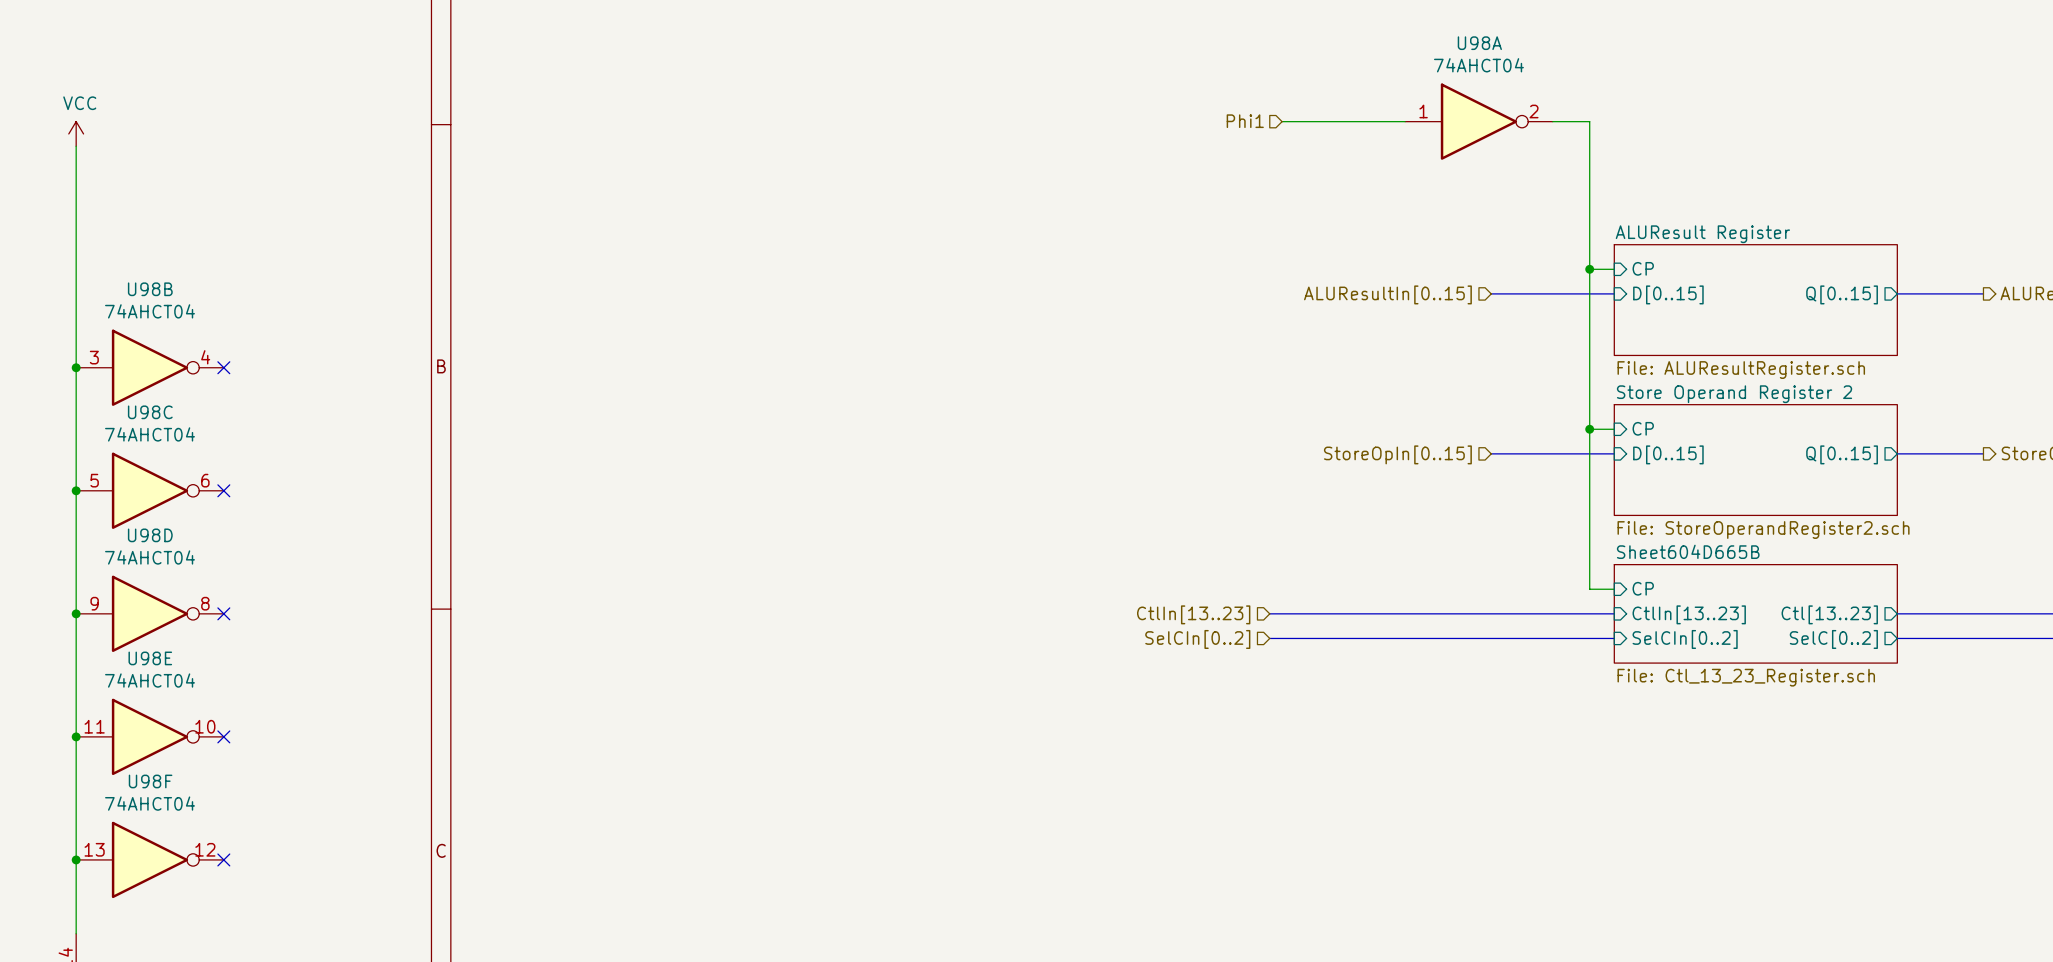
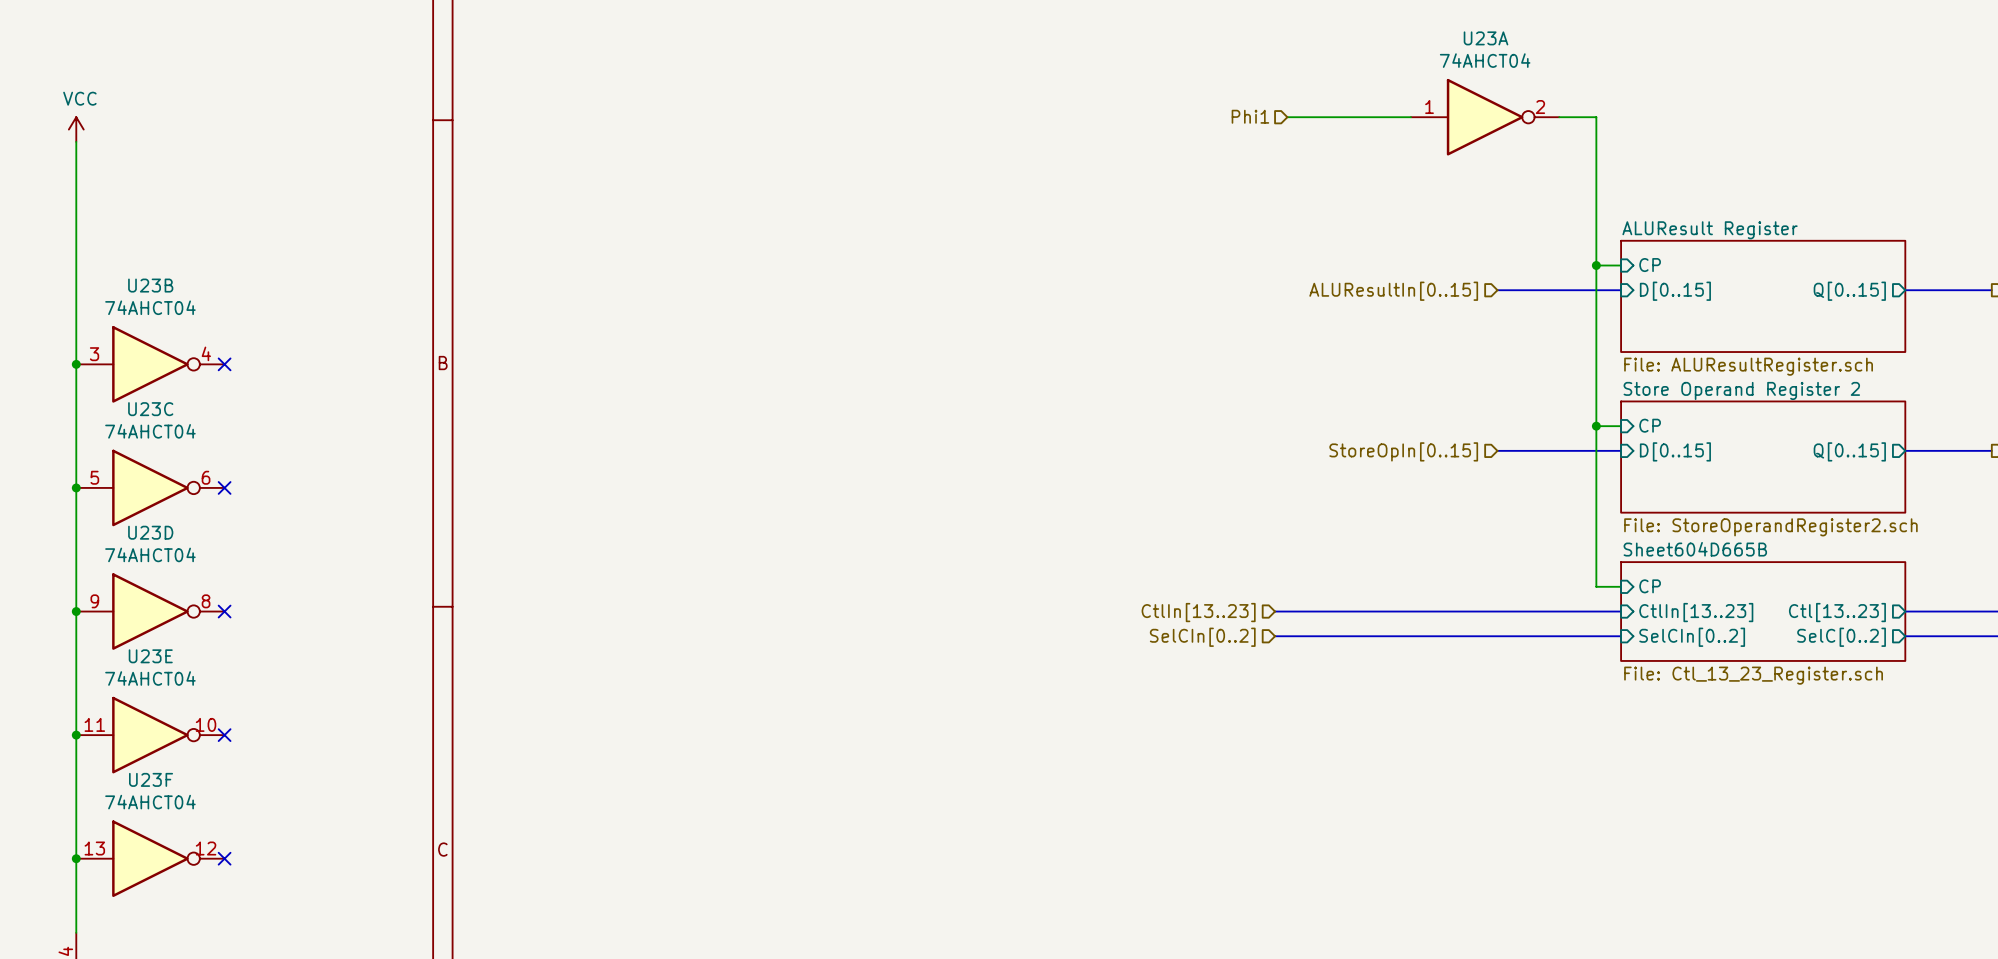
U98A name: U98A (1479, 43) -> U23A (1486, 38)
U98B name: U98B (150, 289) -> U23B (150, 285)
U98C name: U98C (150, 412) -> U23C (150, 409)
U98D name: U98D (150, 535) -> U23D (150, 532)
U98E name: U98E (150, 658) -> U23E (150, 656)
U98F name: U98F (150, 781) -> U23F (151, 779)

